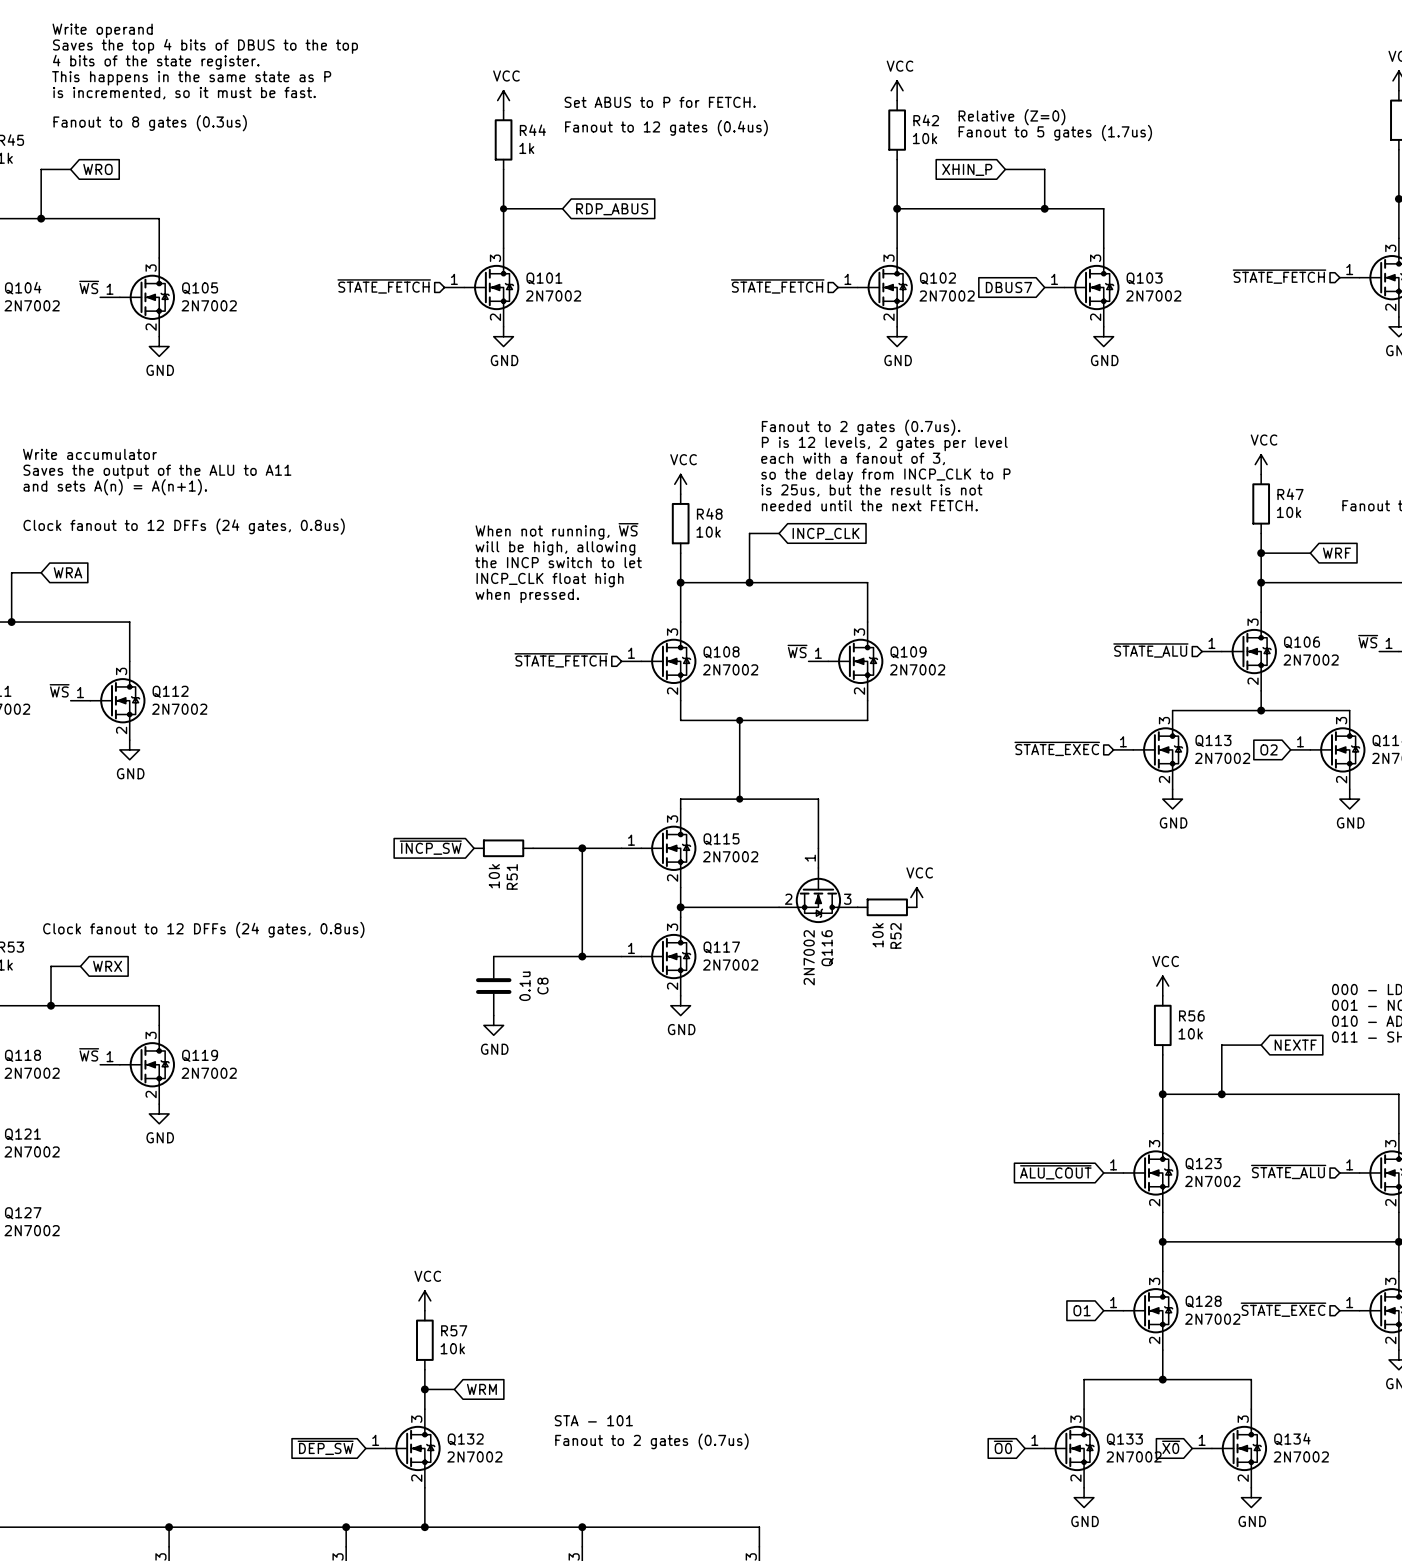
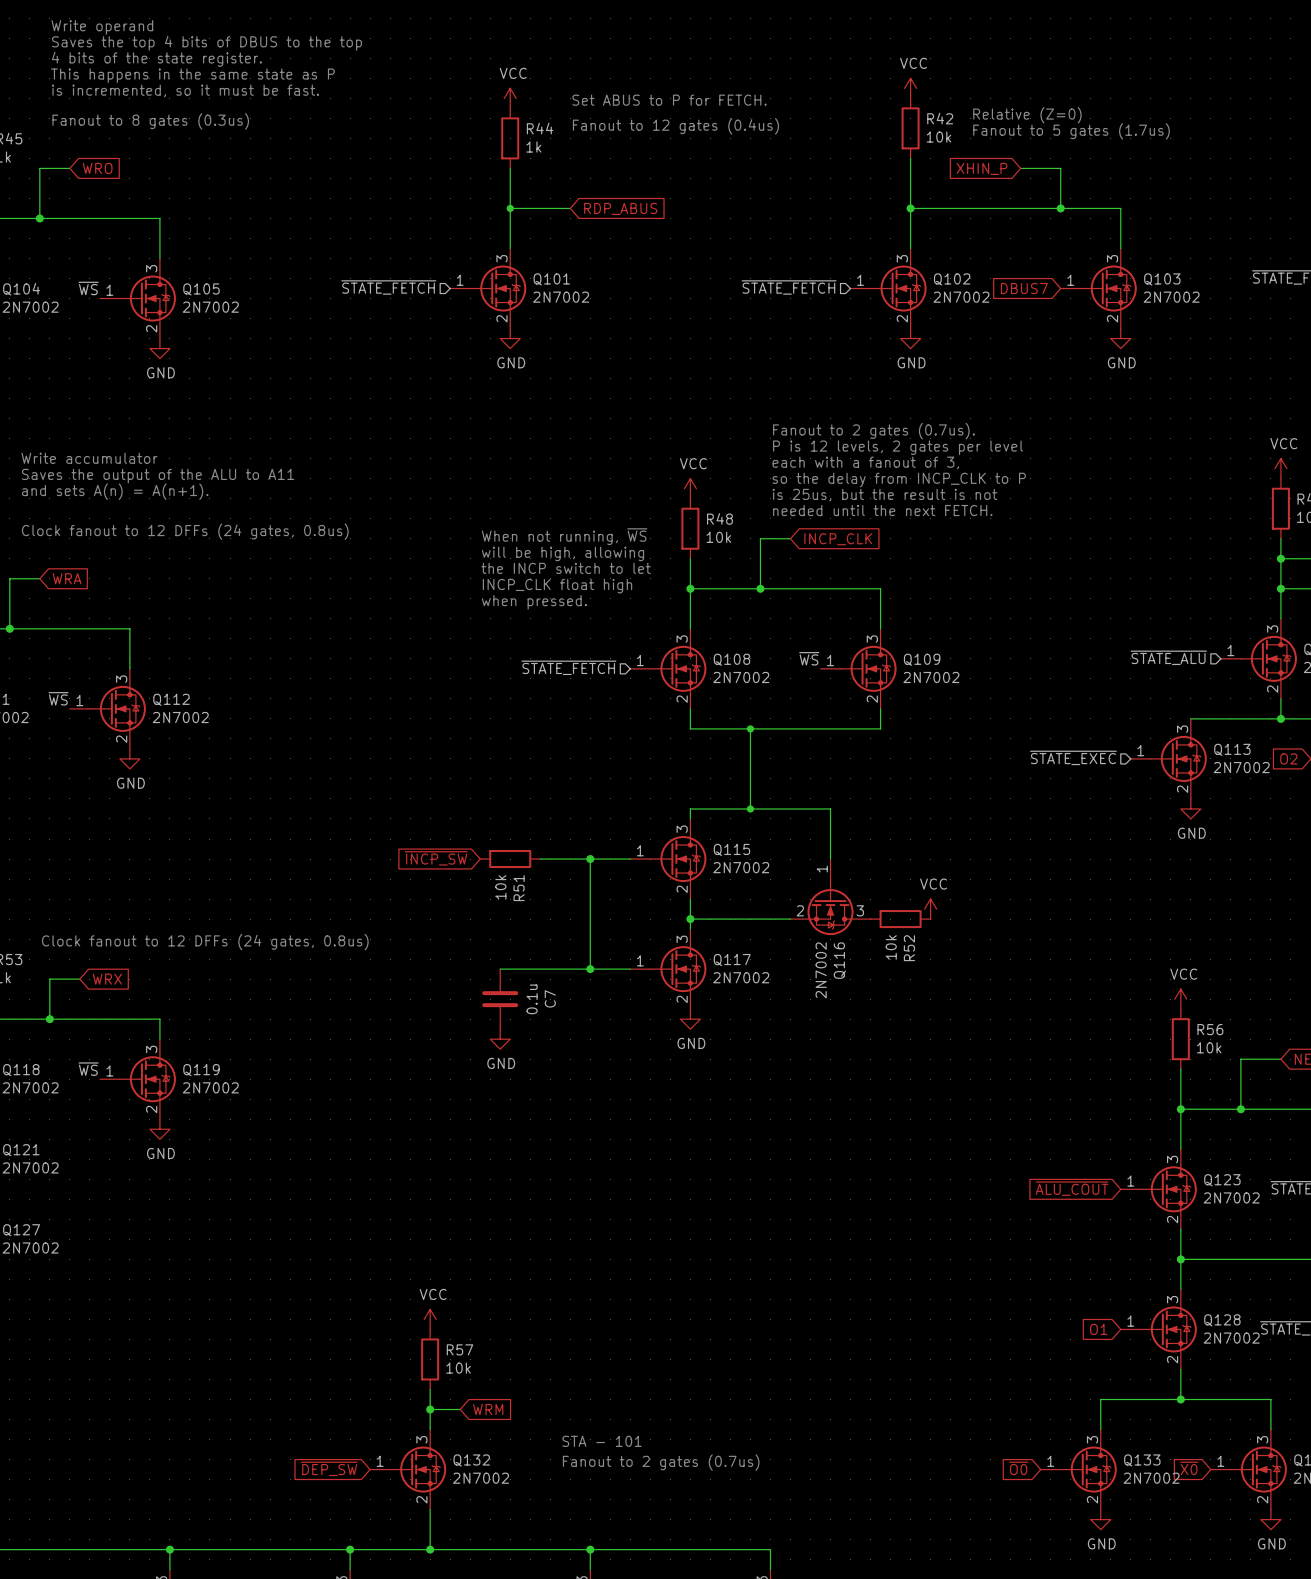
C8 name: C8 (542, 986) -> C7 (550, 998)

